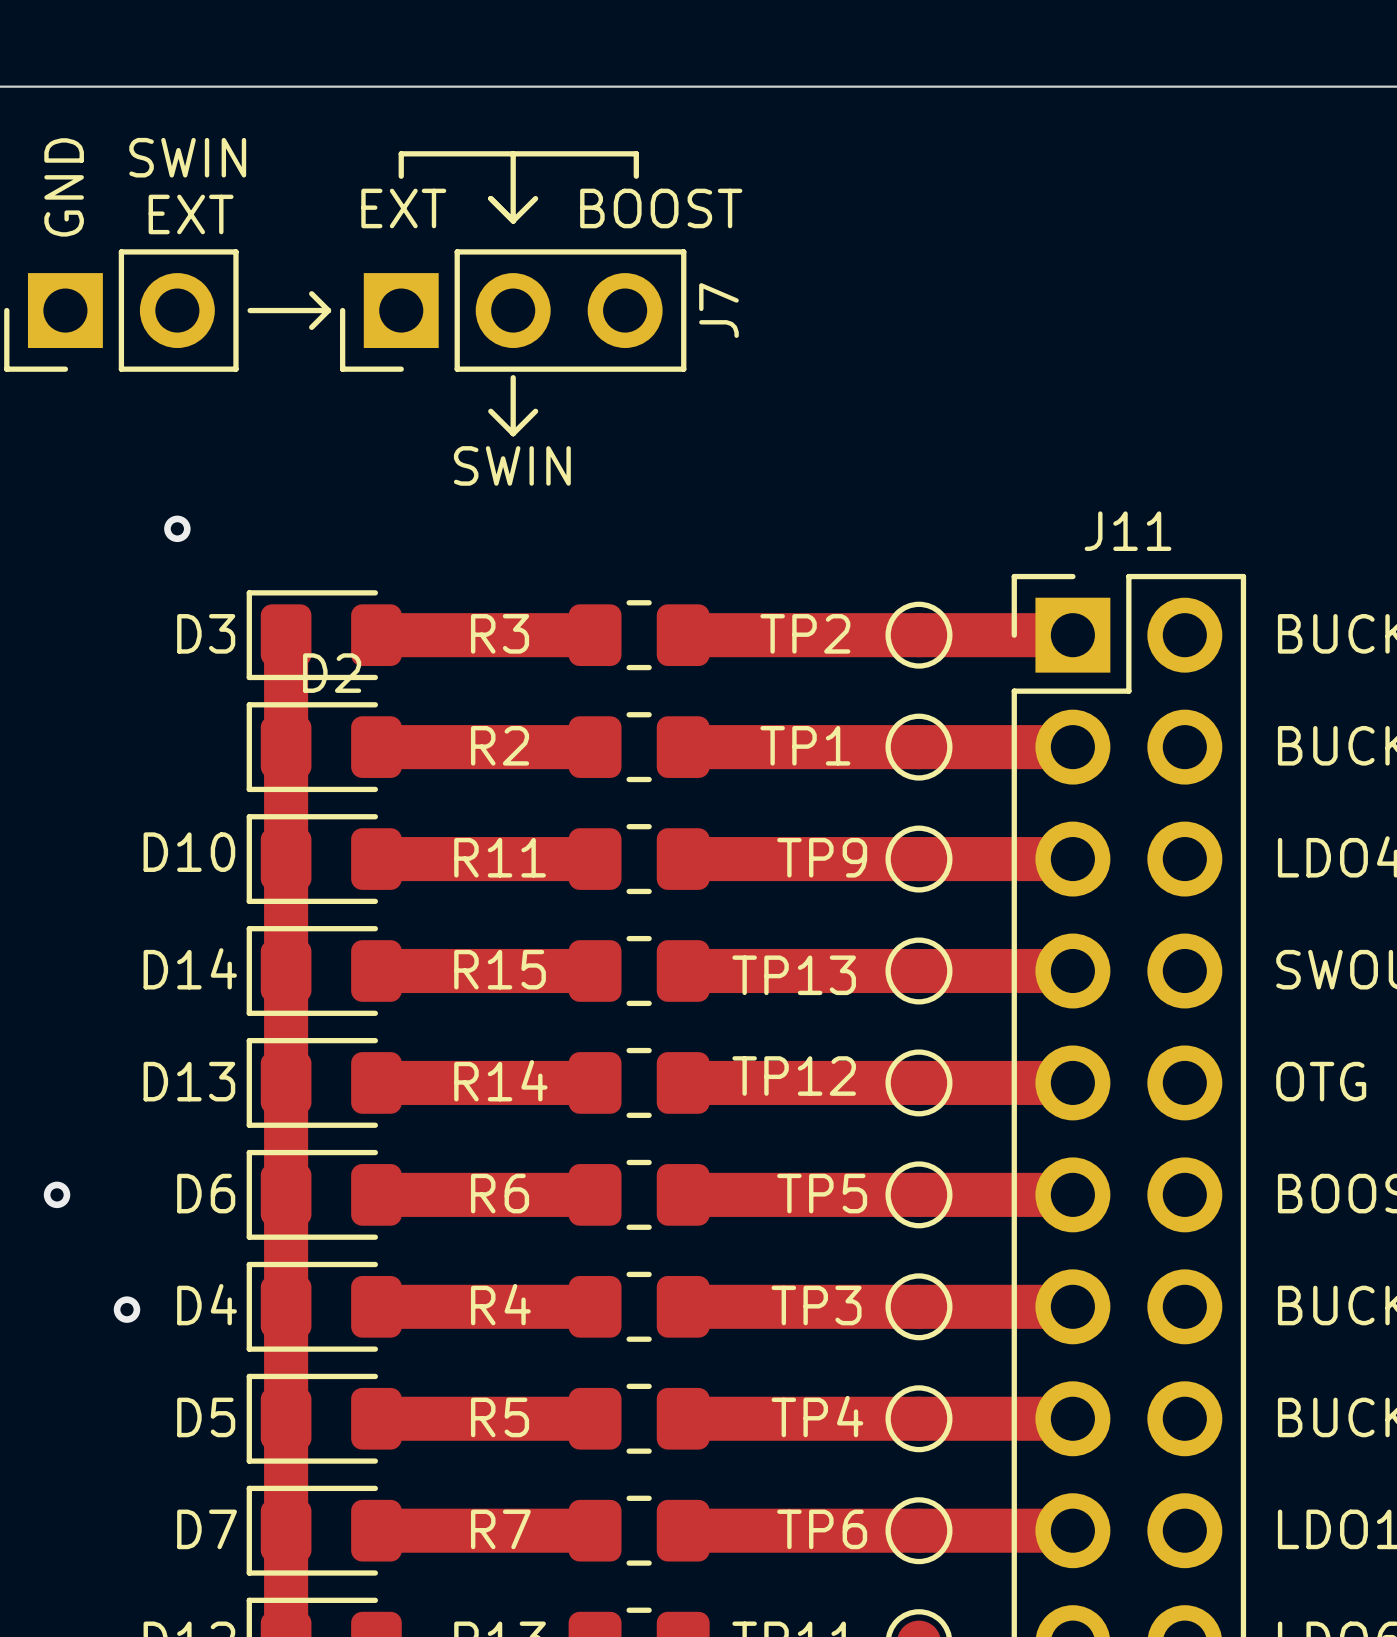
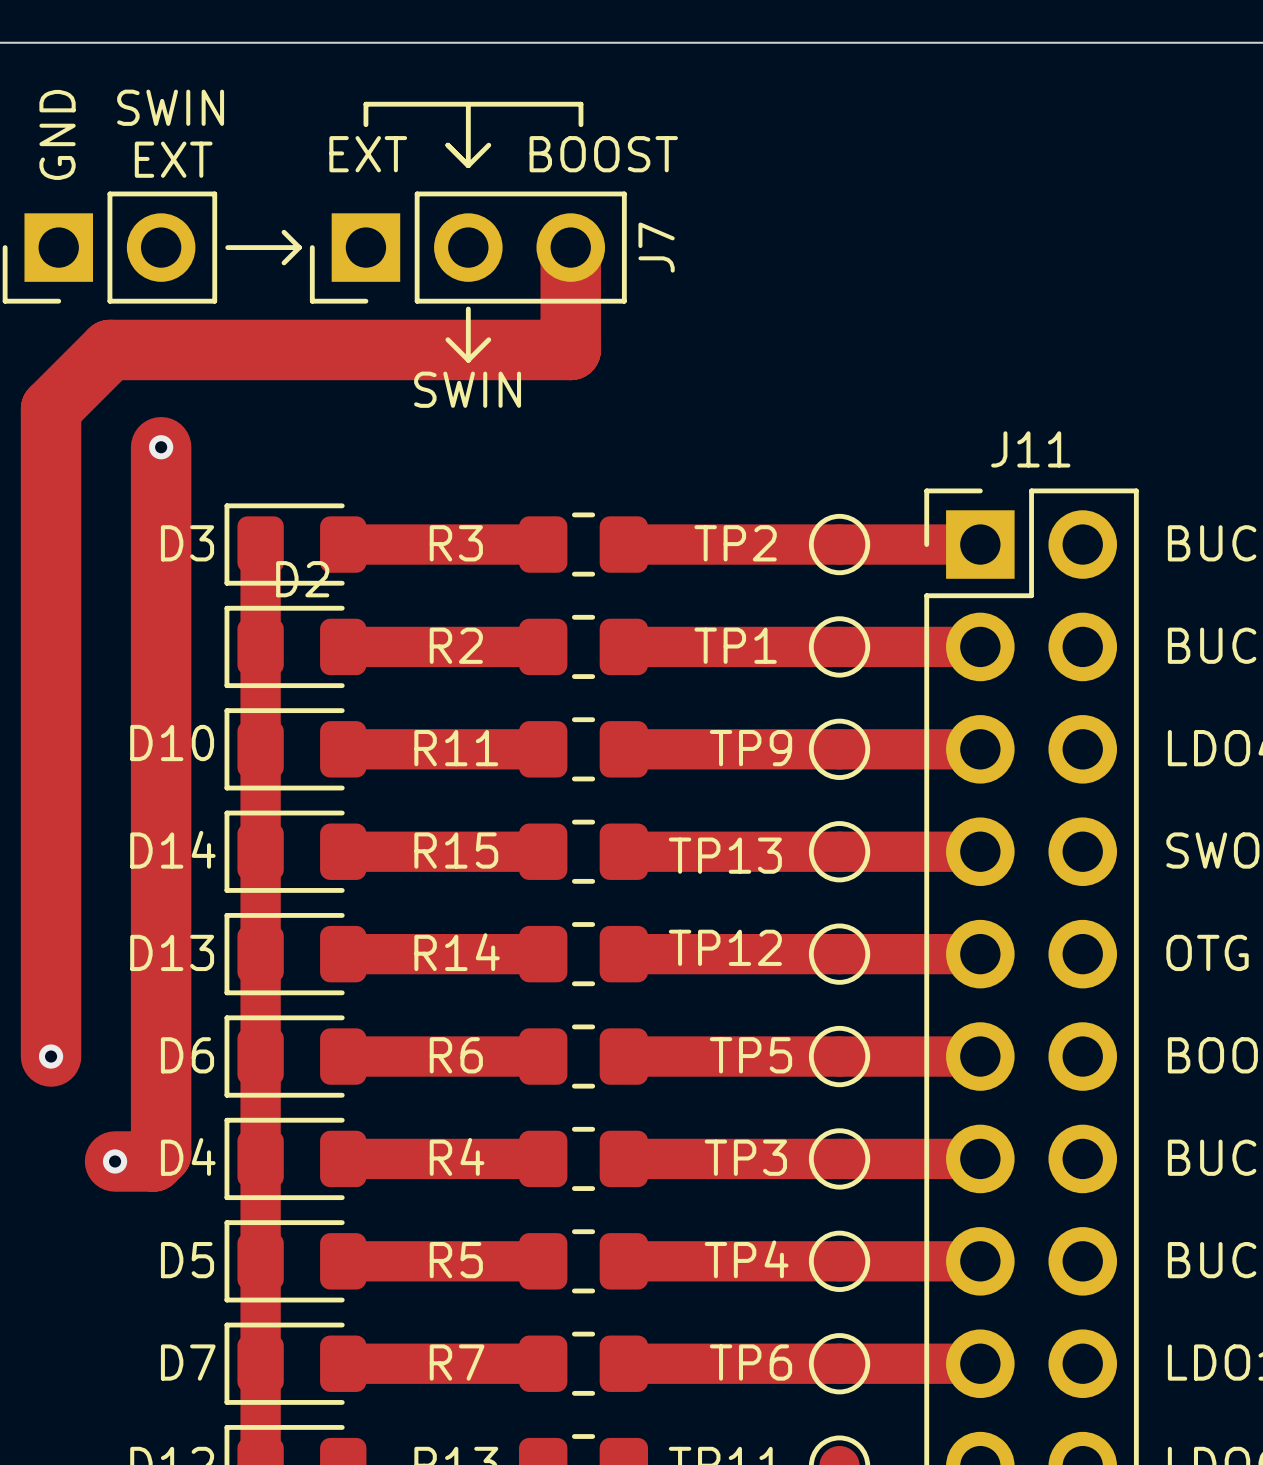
track: none -> (570, 247) (570, 349) (109, 349) (51, 408) (51, 1056)
track: none -> (161, 447) (161, 1153) (153, 1161) (115, 1161)

